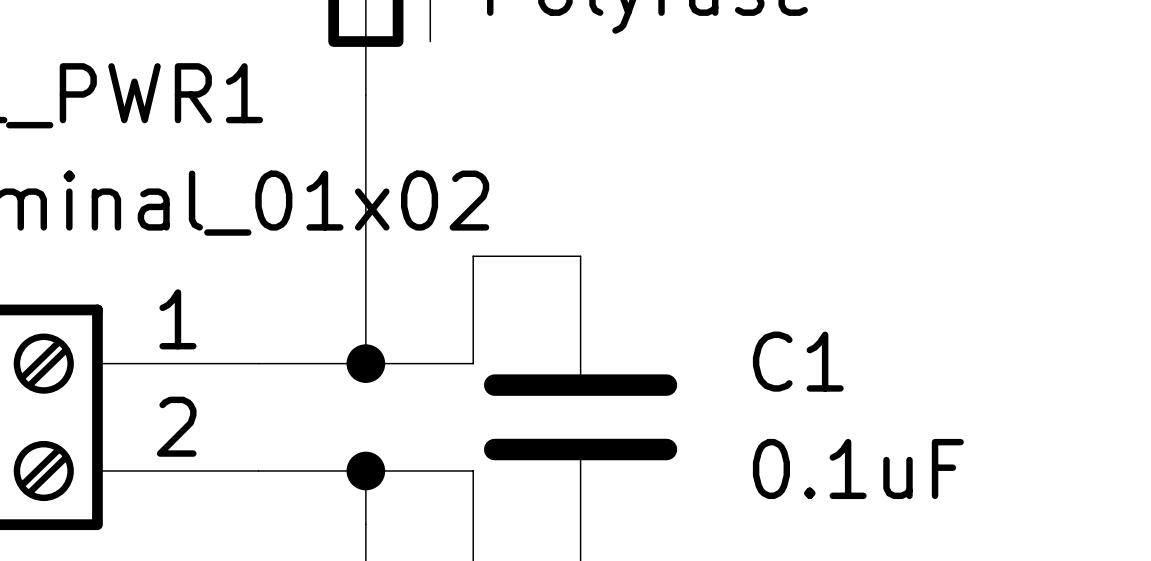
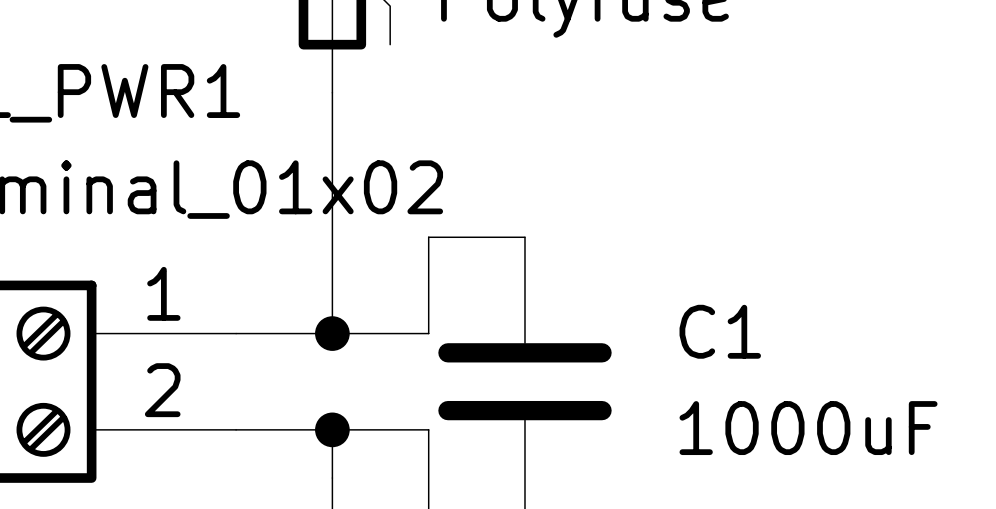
C1 value: 0.1uF (858, 468) -> 1000uF (808, 428)

